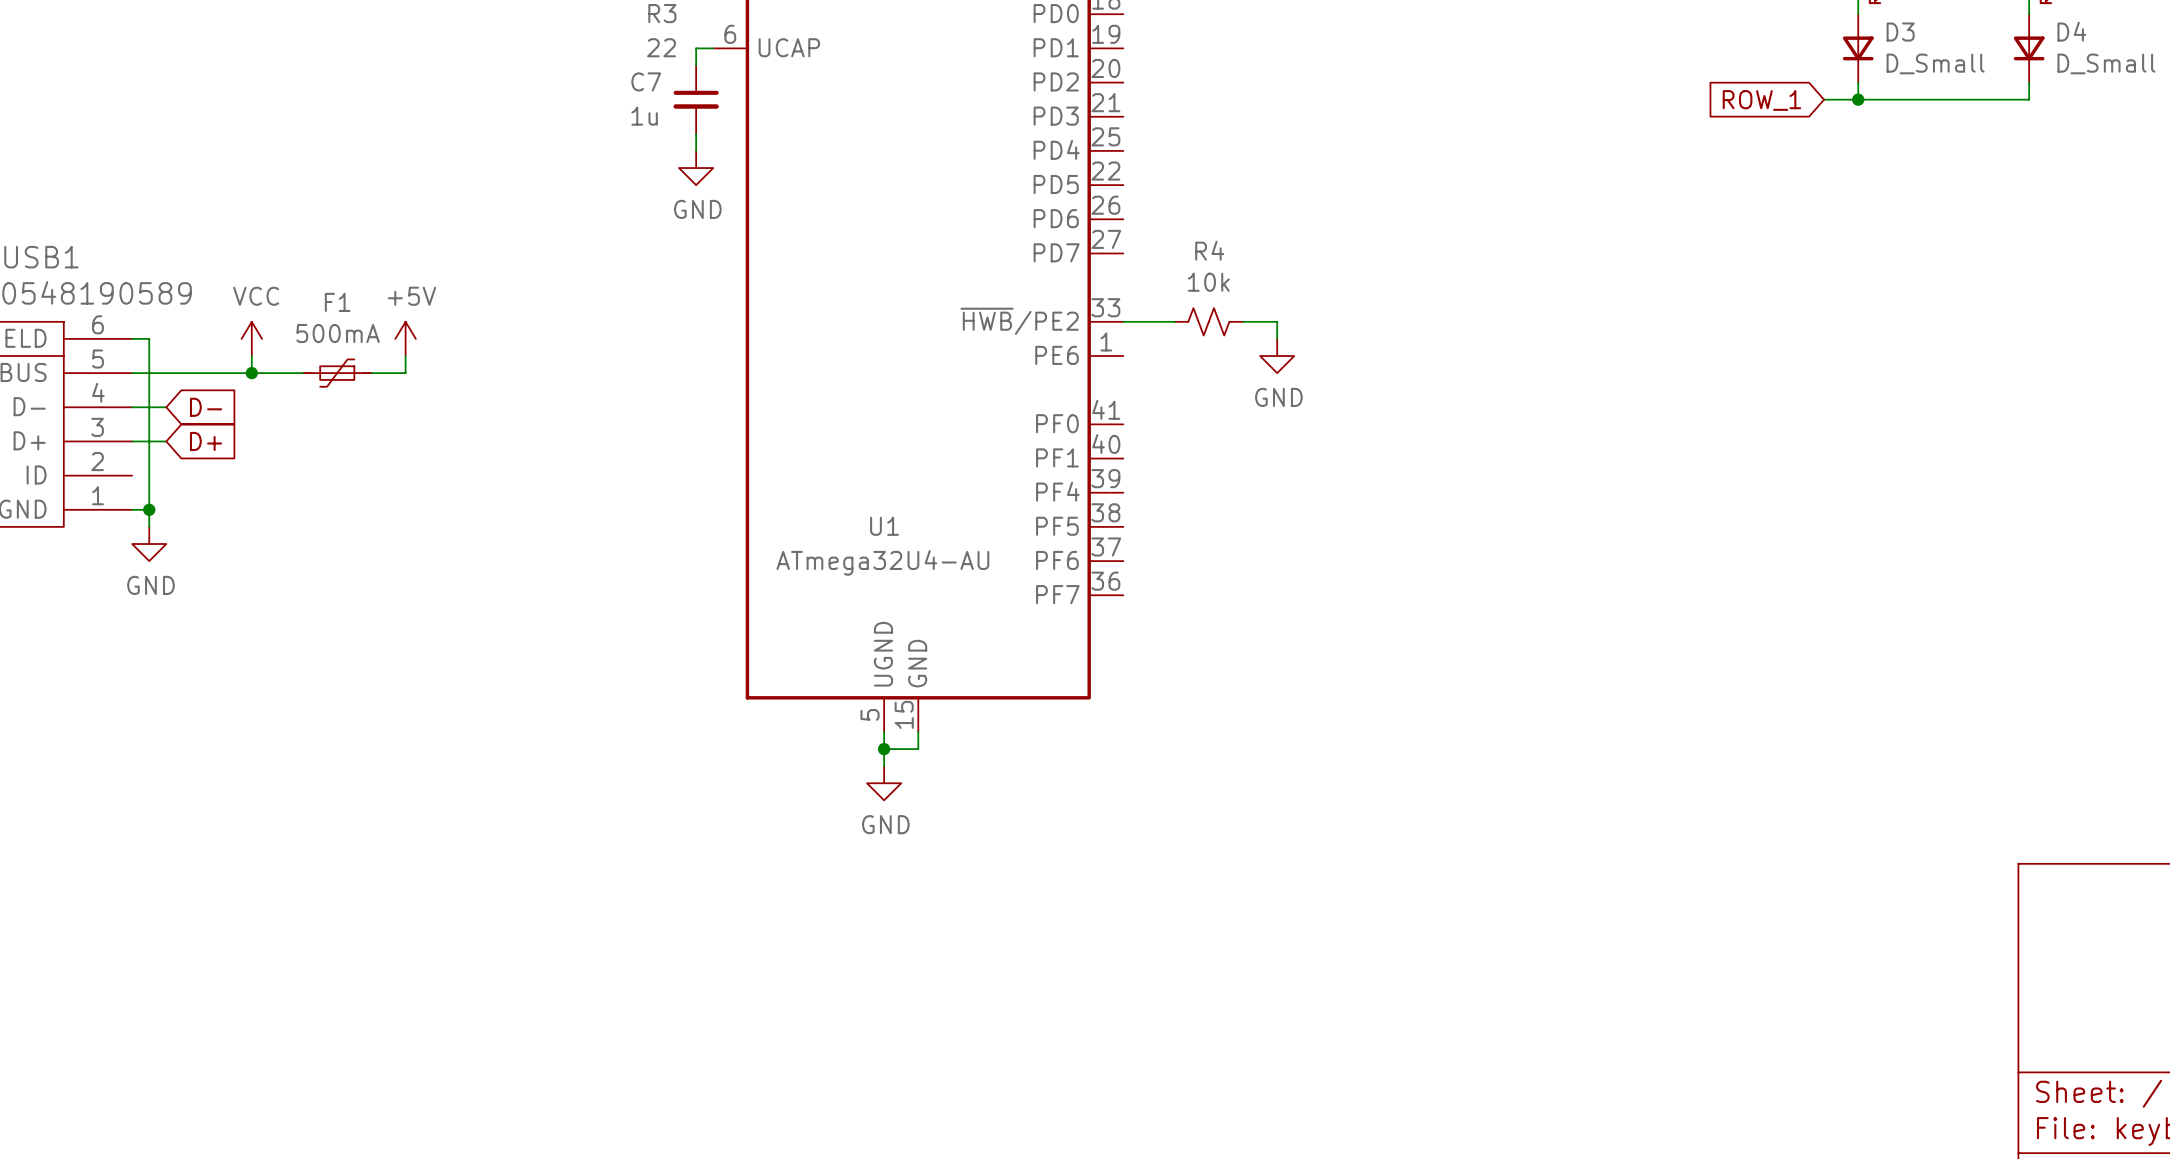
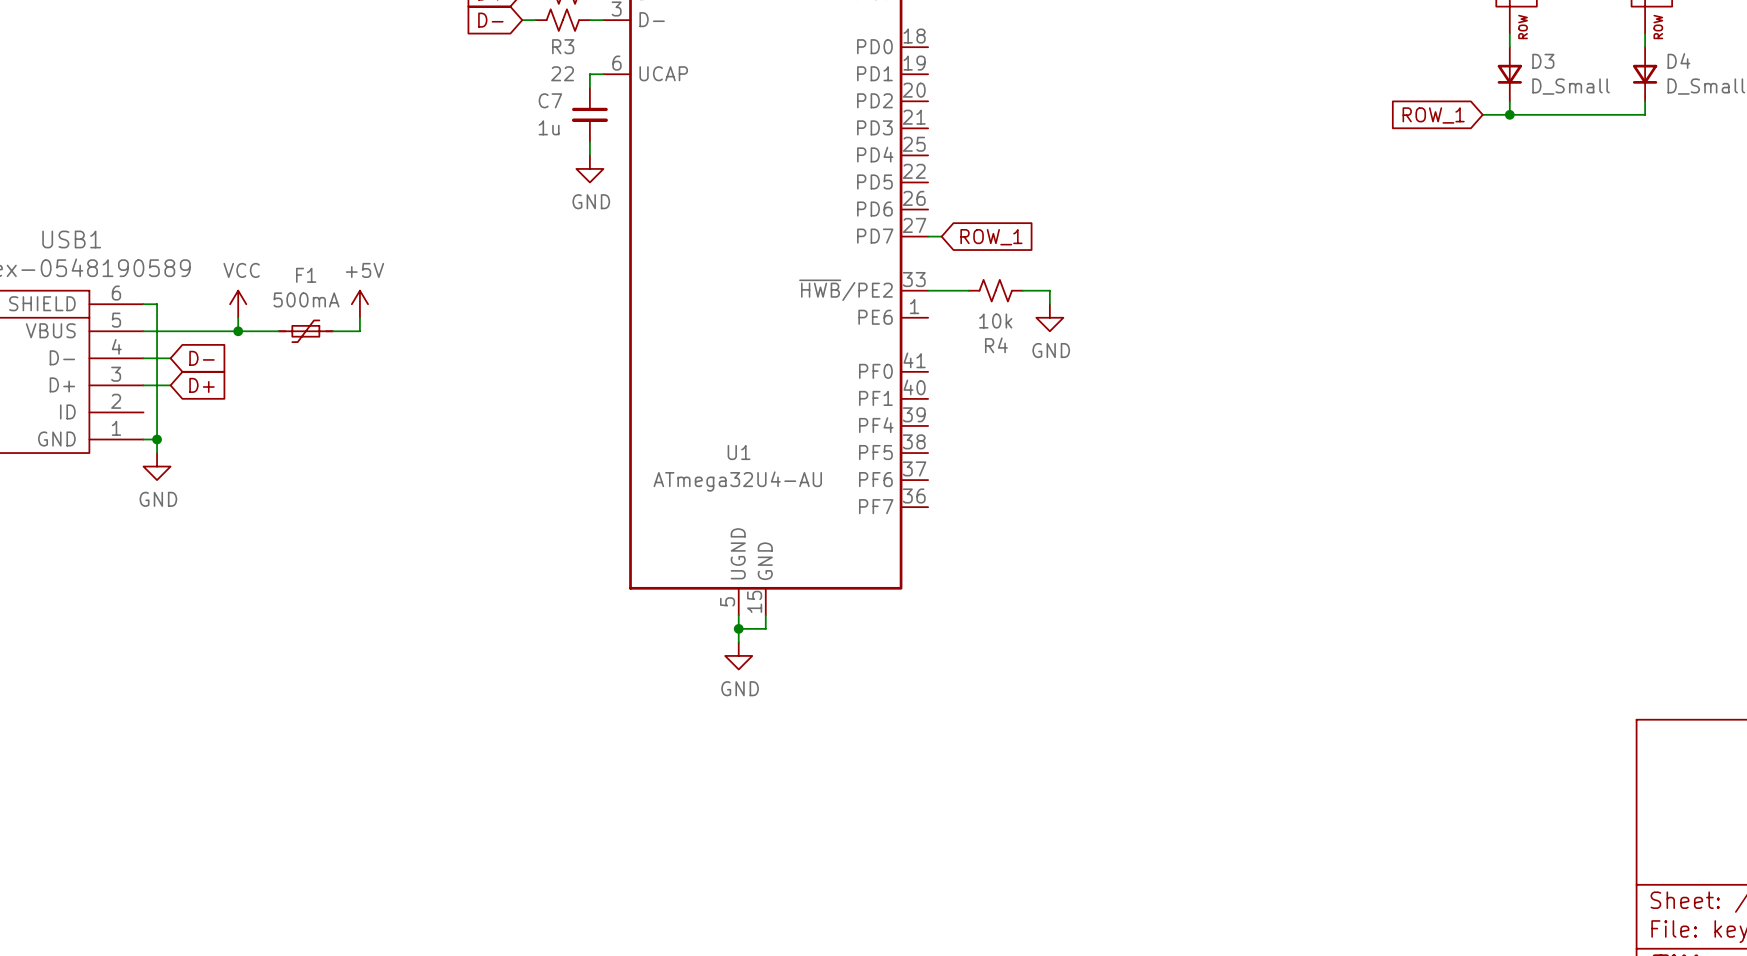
R4 name position: R4 (1209, 250) -> R4 (996, 345)
wire: none -> (928, 236) (941, 236)
global label: none -> ROW_1 (991, 237)
R4 value position: 10k (1208, 282) -> 10k (995, 321)

